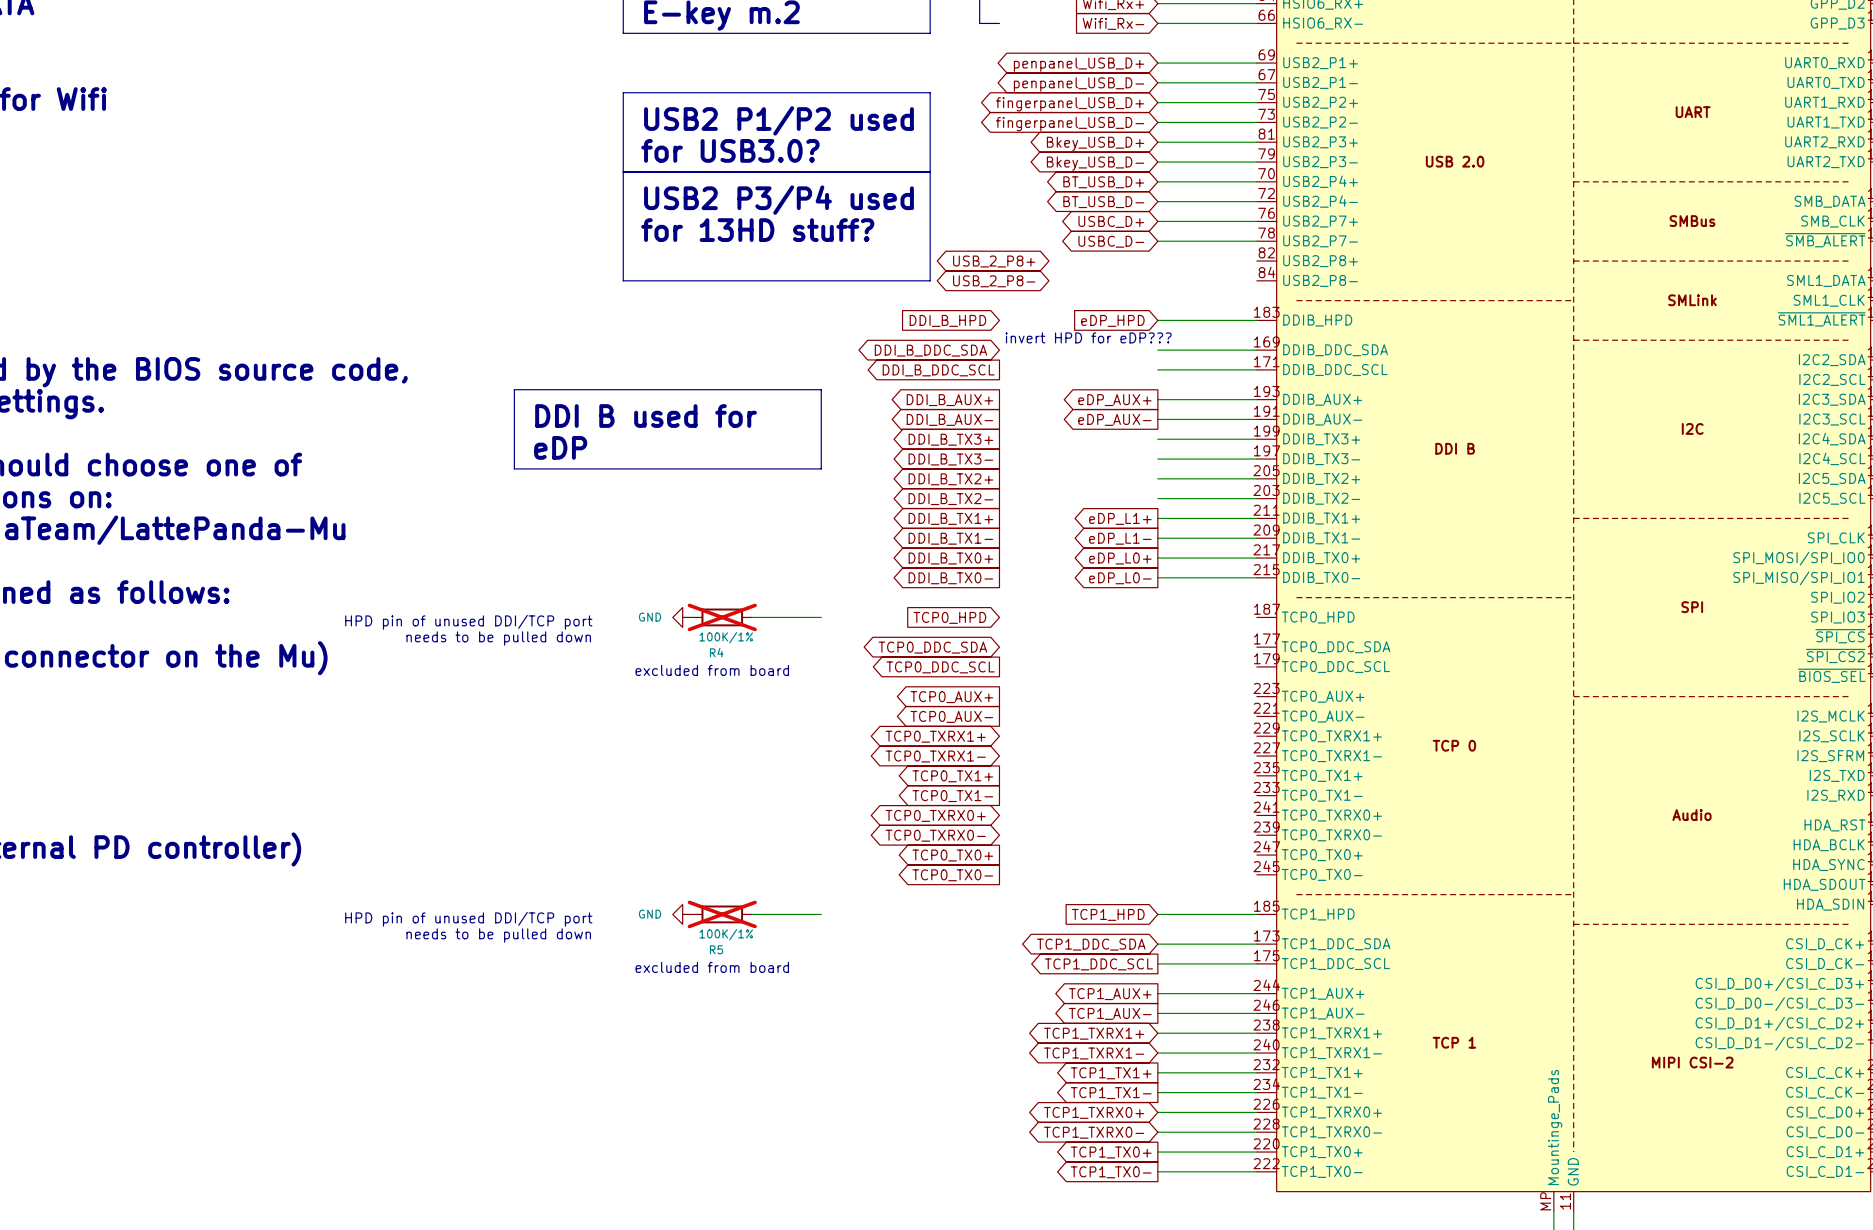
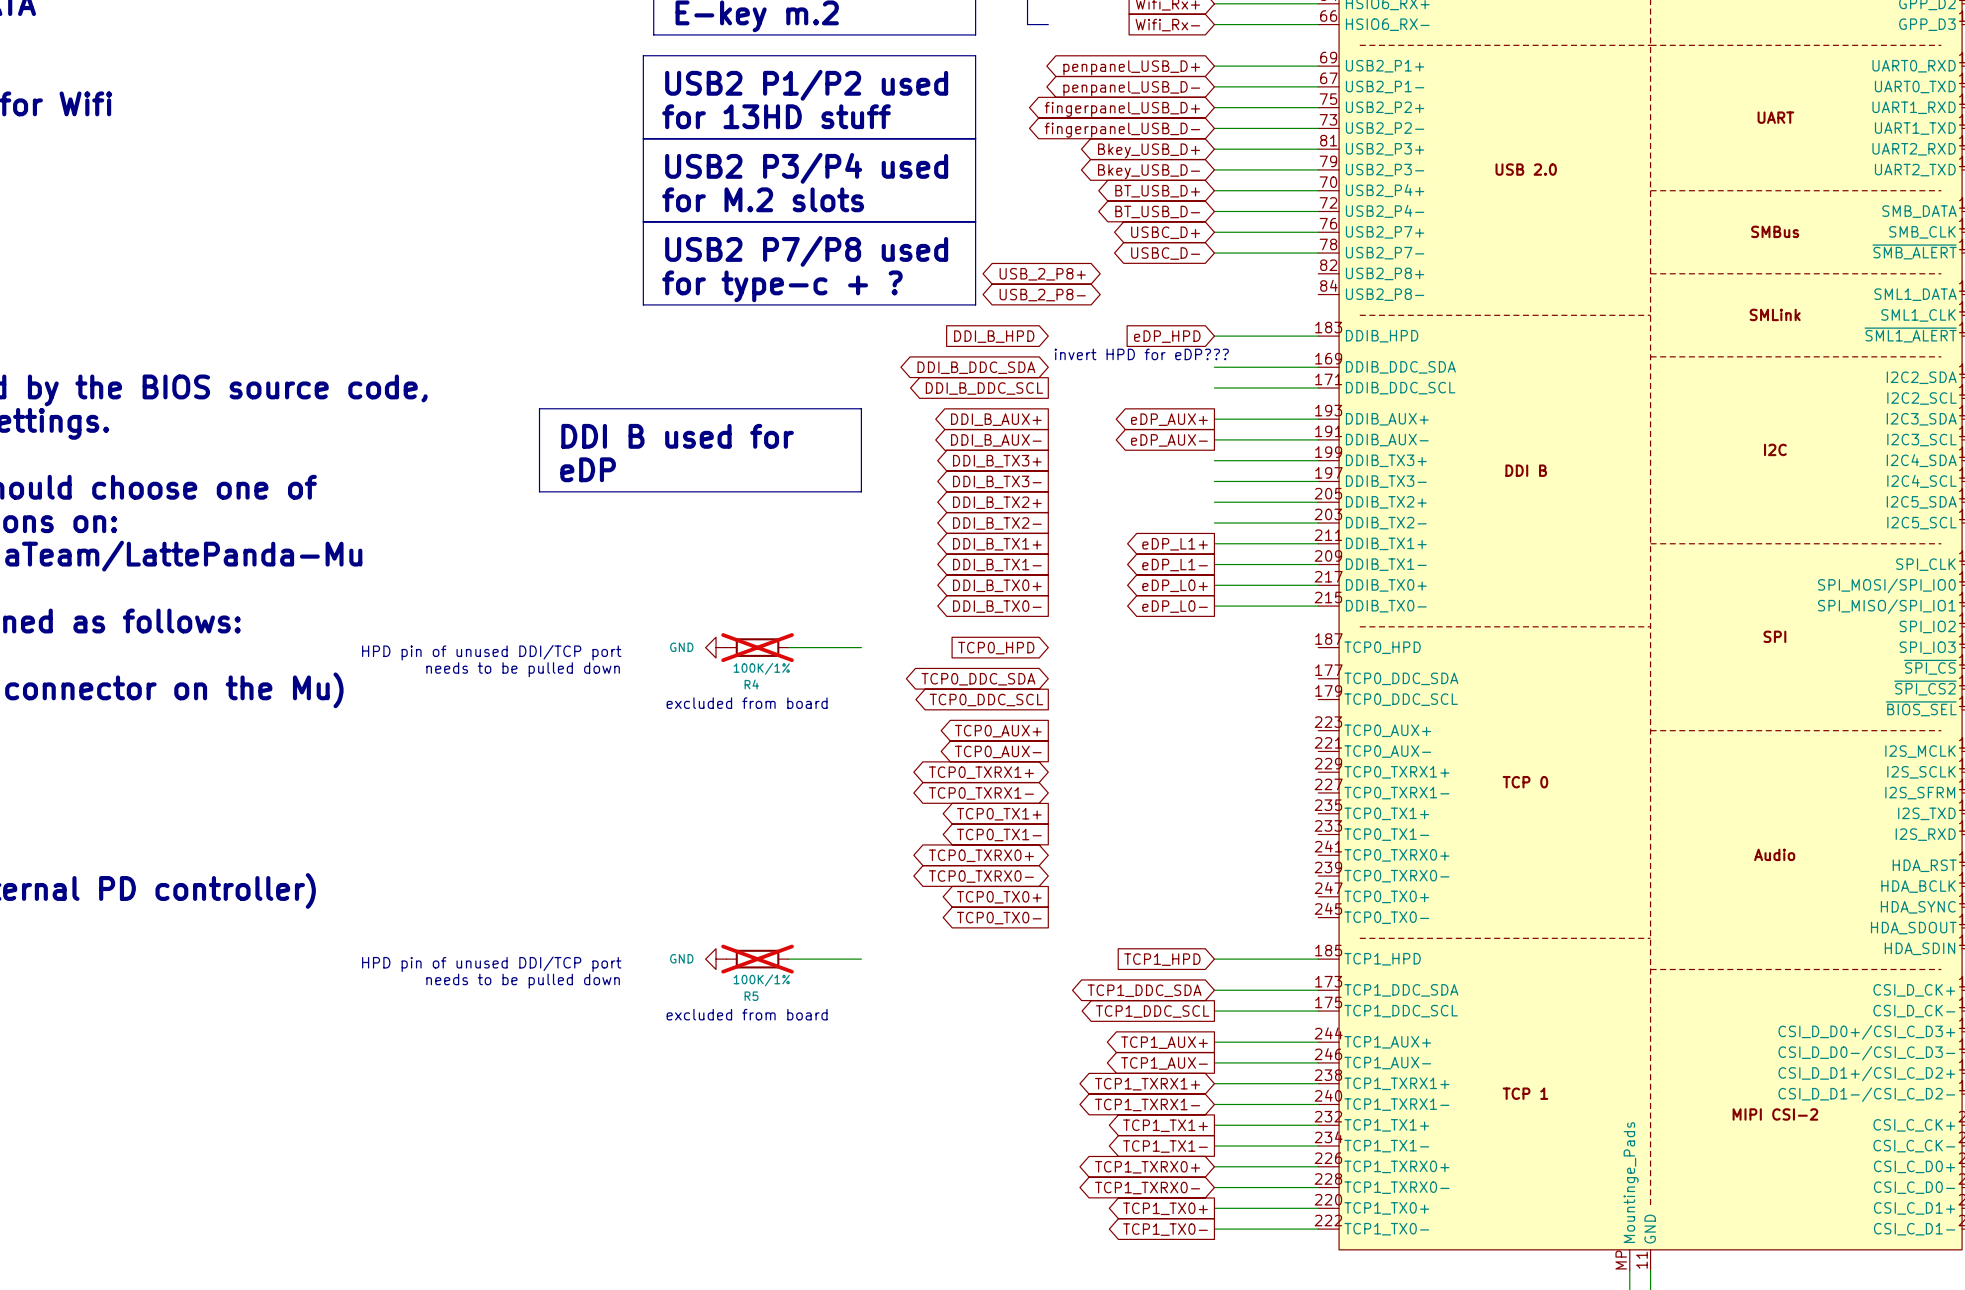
line: (930, 92) (623, 92) (623, 280) (930, 280) -> (975, 97) (975, 55) (643, 55) (643, 304) (975, 304) (975, 294)
text: none -> for 13HD stuff (776, 116)
text position: USB2 P1/P2 used (778, 120) -> USB2 P1/P2 used (806, 85)
line: none -> (643, 138) (975, 138)
text: for USB3.0? (730, 150) -> none
line: (623, 171) (930, 171) -> none
text: none -> for M.2 slots (763, 199)
text position: USB2 P3/P4 used (778, 200) -> USB2 P3/P4 used (806, 168)
line: none -> (643, 221) (975, 221)
text: for 13HD stuff? (757, 230) -> none
text: none -> USB2 P7/P8 used (806, 251)
text: none -> for type-c + ? (782, 286)

